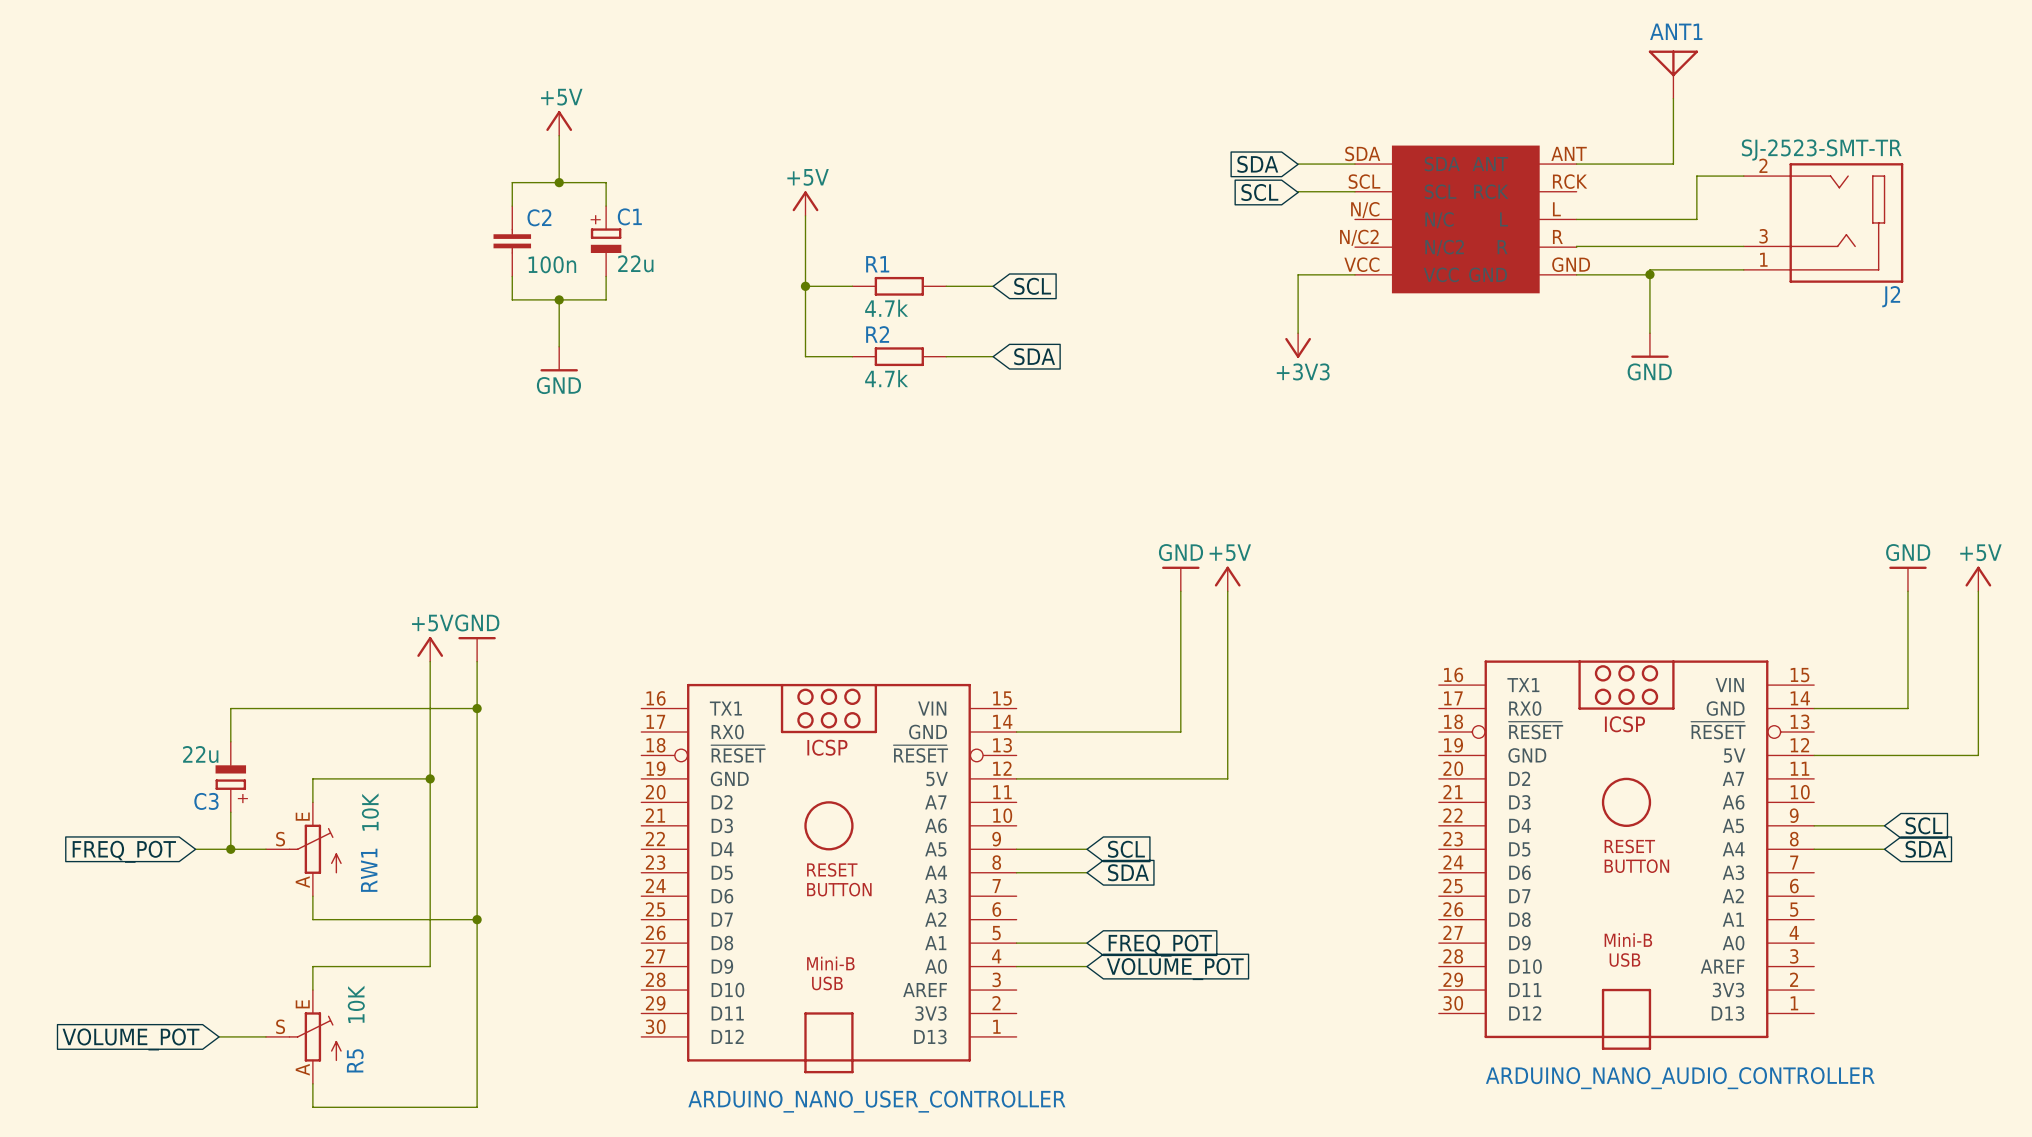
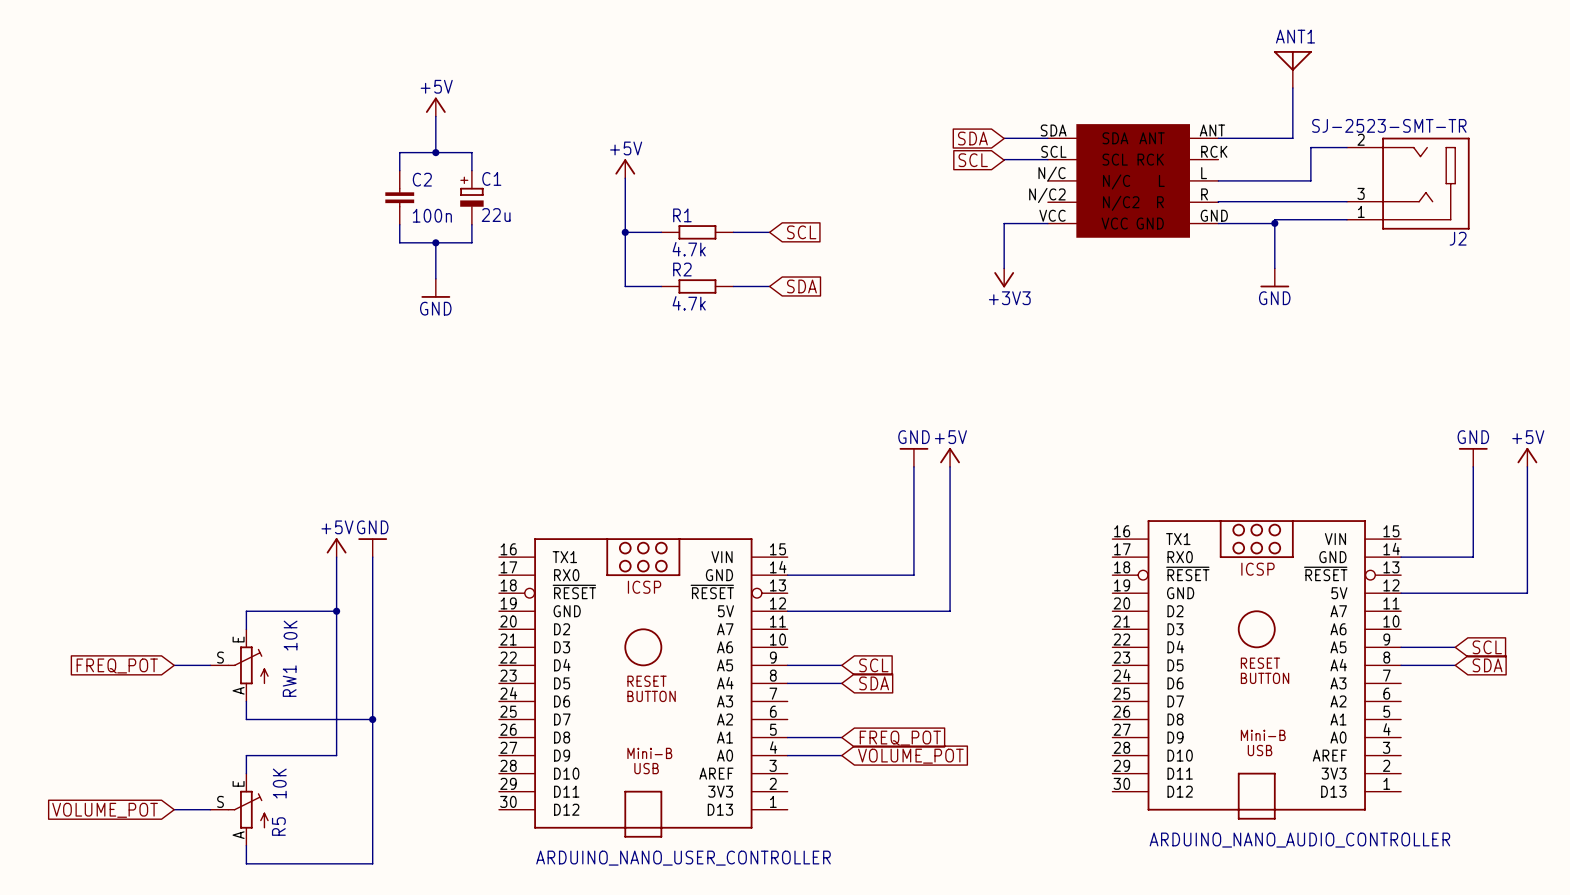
power symbol position: +5V (430, 649) -> +5V (336, 547)
power symbol position: GND (477, 649) -> GND (372, 547)
wire: (477, 661) (477, 708) (230, 708) (230, 741) -> none
junction: (477, 708) -> none
C3: 22u (230, 777) -> none
wire: (230, 812) (230, 849) -> none
wire: (195, 849) (219, 849) -> none
junction: (230, 849) -> none
global label position: FREQ_POT (124, 851) -> FREQ_POT (117, 665)

